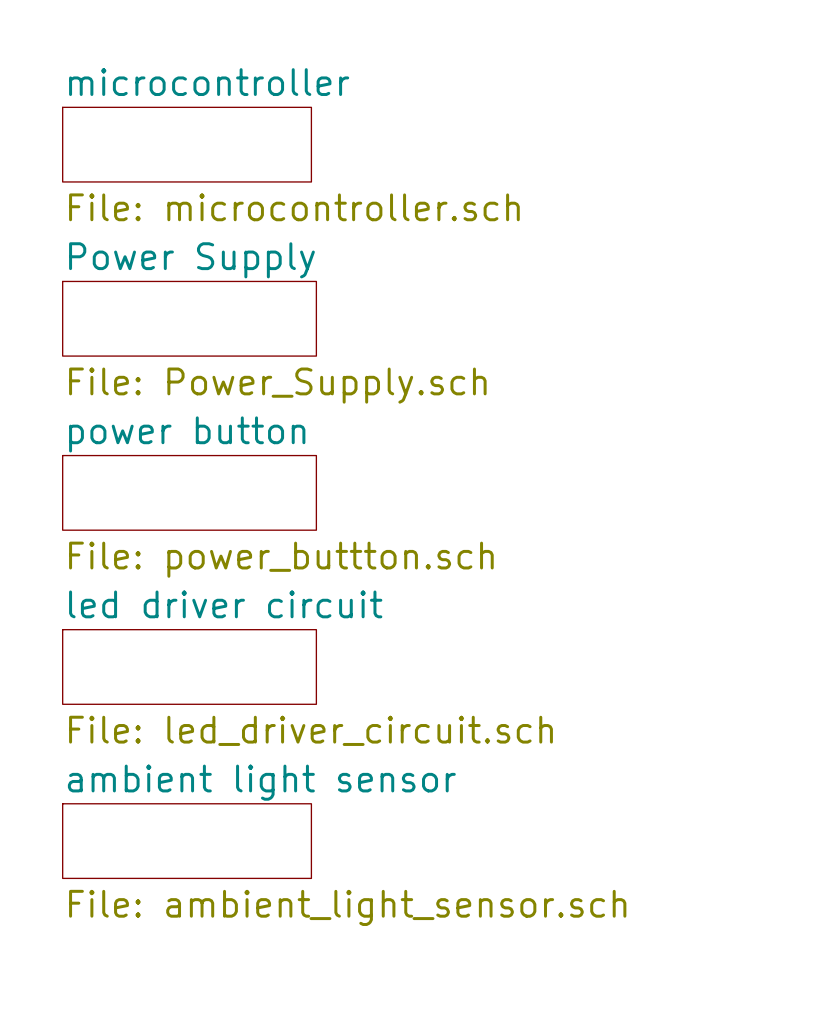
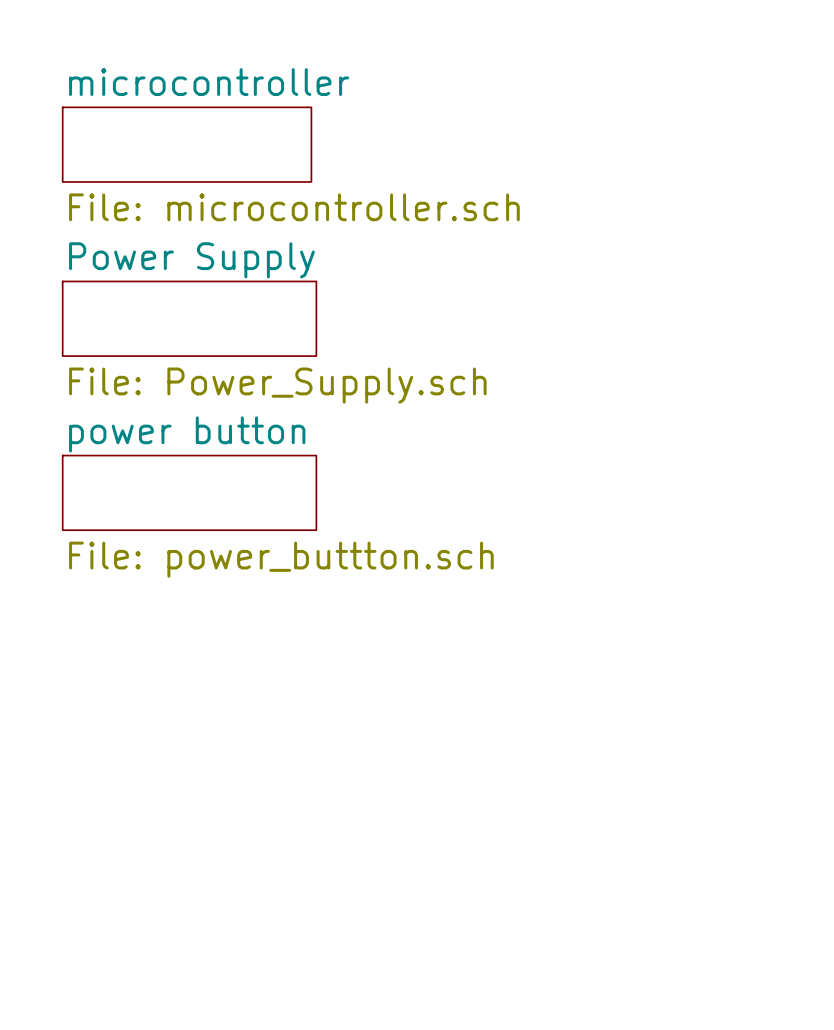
sheet led driver circuit: File: led_driver_circuit.sch (189, 666) -> none
sheet ambient light sensor: File: ambient_light_sensor.sch (187, 841) -> none

